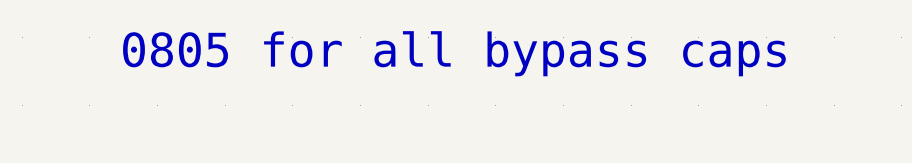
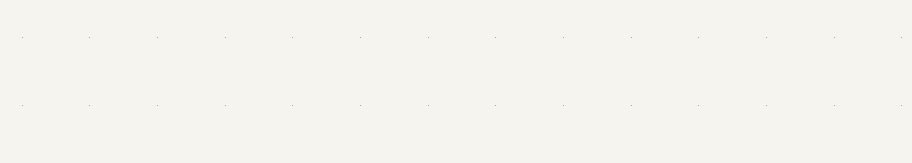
text: 0805 for all bypass caps (454, 53) -> none

